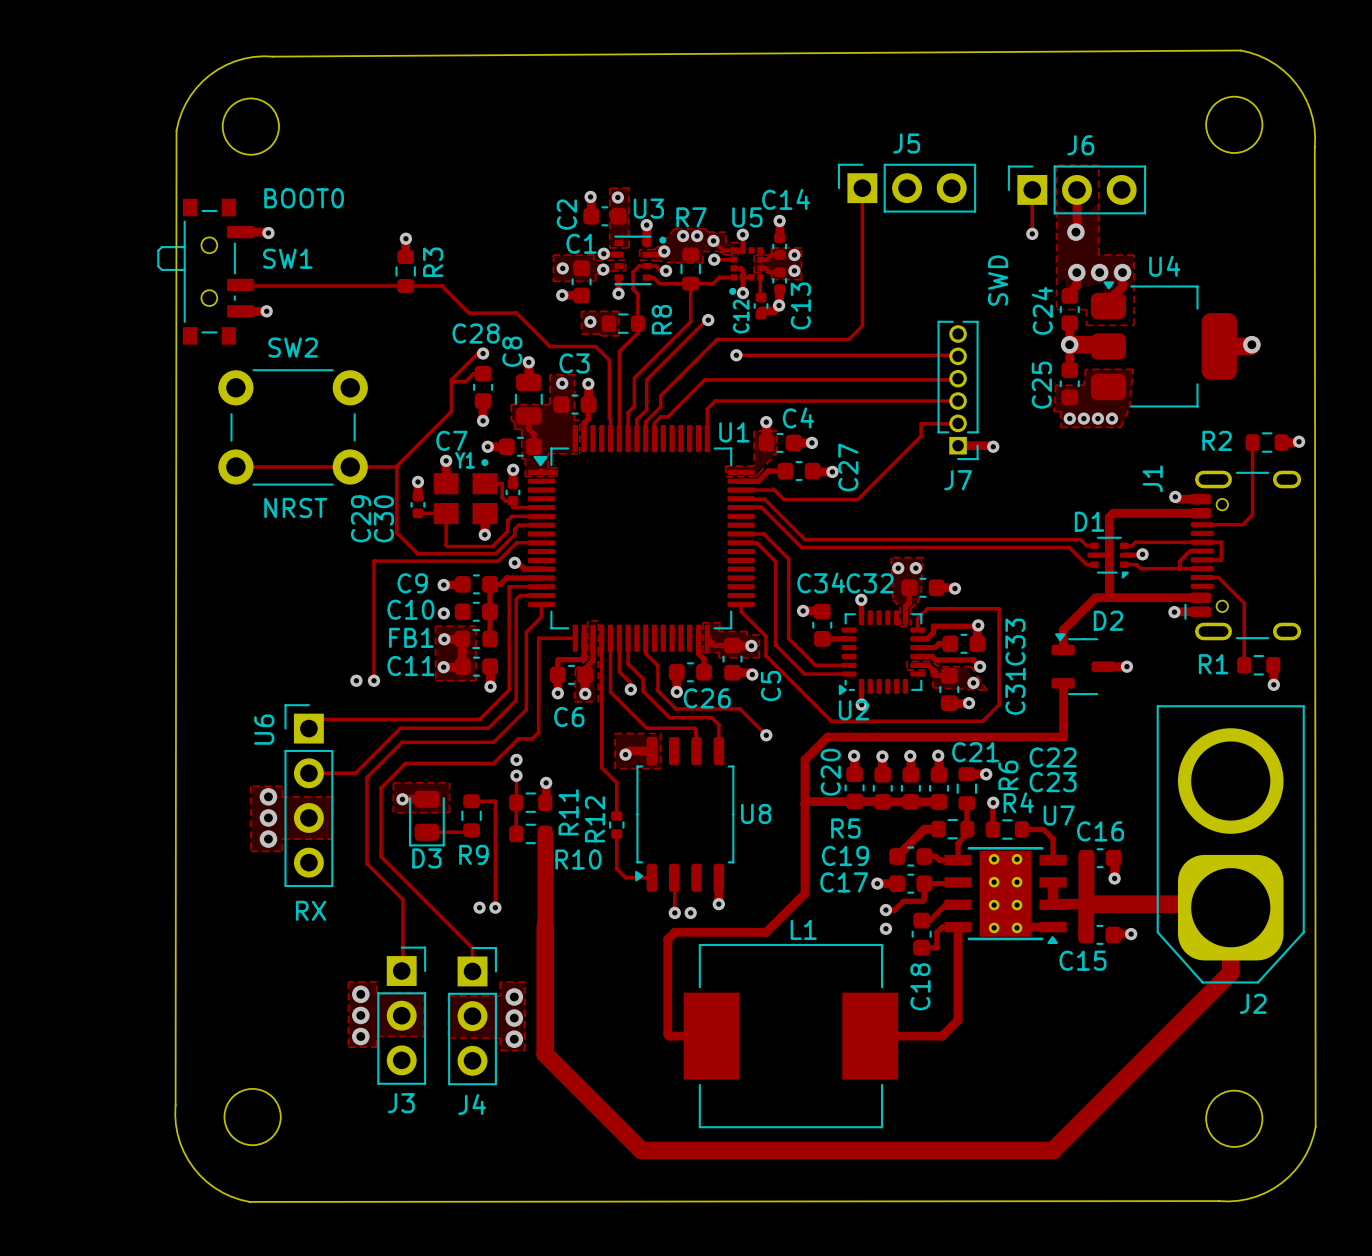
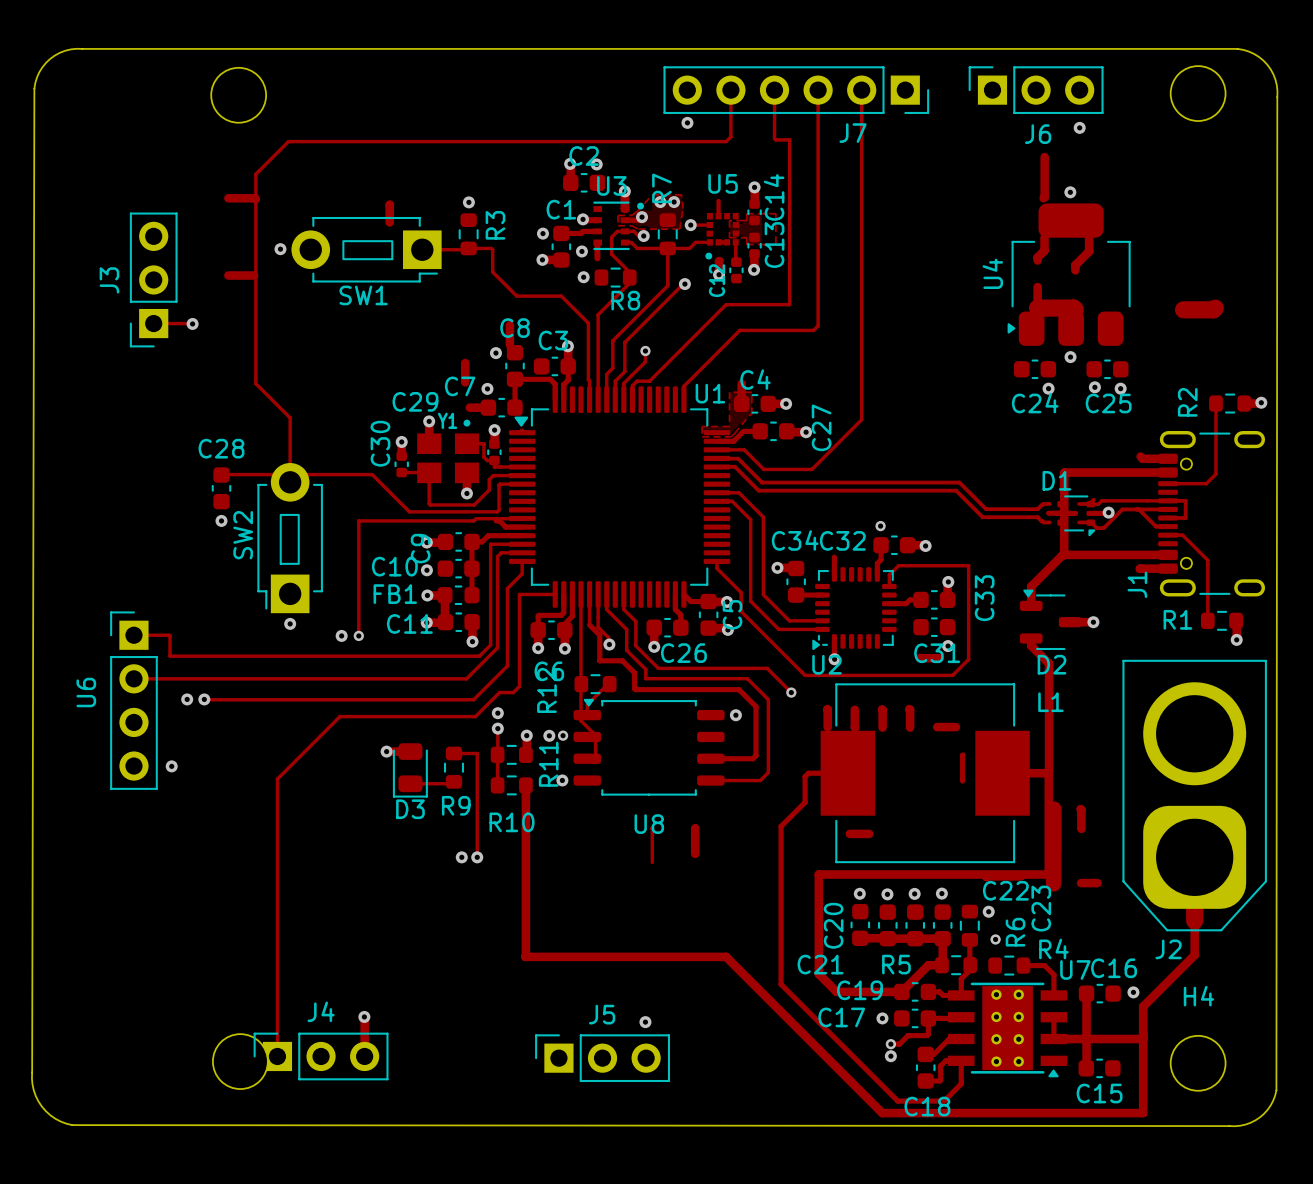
board edge: (1240, 50) (263, 56) (244, 58) (226, 64) (210, 74) (196, 87) (181, 112) (176, 130) (175, 1114) (177, 1133) (183, 1151) (193, 1168) (206, 1181) (231, 1196) (249, 1201) (1228, 1201) (1247, 1199) (1265, 1192) (1281, 1182) (1295, 1169) (1306, 1153) (1315, 1126) (1315, 137) (1310, 109) (1296, 84) (1283, 70) (1267, 59) (1240, 50) -> (82, 48) (65, 50) (50, 58) (39, 72) (34, 88) (31, 1078) (35, 1096) (50, 1115) (72, 1125) (1234, 1126) (1250, 1122) (1267, 1109) (1276, 1090) (1277, 91) (1273, 74) (1263, 60) (1254, 53) (1237, 48) (82, 48)
track: none -> (730, 90) (730, 136) (726, 141) (288, 141) (255, 174) (255, 383) (290, 417) (290, 482)
J6 name position: J6 (1080, 145) -> J6 (1038, 134)
via: none -> (687, 122)
via: none -> (1079, 127)
zone outline: (1056, 165) (1056, 309) (1086, 309) (1086, 325) (1133, 325) (1133, 255) (1098, 255) (1098, 165) (1056, 165) -> none
zone outline: (609, 188) (629, 188) (629, 247) (609, 247) (609, 188) -> none
track: (862, 188) (862, 326) (848, 339) (717, 339) (660, 395) (660, 406) -> (645, 351) (645, 361) (638, 368)
J5 position: (907, 188) -> (602, 1058)
track: (1032, 189) (1032, 233) -> none
J6 position: (1076, 189) -> (1036, 90)
SW1 footprint: [157, 198, 254, 345] -> [291, 216, 442, 283]
text: BOOT0 (304, 198) -> none
C14 name rotation: 0° (786, 199) -> 90° counterclockwise (774, 197)
U3 name position: U3 (648, 208) -> U3 (611, 185)
C2 name rotation: 0° (566, 214) -> 90° clockwise (584, 156)
C2 name position: C2 (566, 214) -> C2 (584, 156)
R7 name rotation: 0° (691, 217) -> 90° counterclockwise (661, 188)
via: none -> (1070, 192)
zone outline: (704, 228) (708, 232) (725, 232) (725, 242) (738, 242) (738, 255) (725, 255) (719, 251) (702, 251) (702, 262) (653, 260) -> (681, 194) (683, 208) (679, 229) (638, 229) (631, 225)
via: (1075, 232) -> none
via: (268, 233) -> none
via: (1032, 233) -> none
via: (742, 234) -> none
via: none -> (468, 202)
via: (405, 238) -> none
track: (713, 240) (723, 250) (733, 250) -> none
via: (713, 240) -> none
track: (779, 254) (771, 254) (767, 259) (760, 259) -> none
zone outline: (553, 255) (593, 255) (593, 260) (625, 260) (625, 270) (611, 270) (604, 274) (595, 274) (595, 281) (553, 281) (553, 255) -> none
via: (794, 255) -> none
SW1 name position: SW1 (287, 258) -> SW1 (363, 295)
track: none -> (597, 231) (557, 233)
track: (733, 268) (742, 270) (742, 292) -> none
track: (760, 268) (765, 268) (769, 272) (779, 272) -> none
via: (603, 269) -> none
via: (794, 270) -> none
R3 position: (405, 271) -> (468, 234)
via: (1076, 272) -> none
via: (1099, 272) -> none
via: (1122, 272) -> none
text: SWD (998, 280) -> none
track: (240, 284) (441, 285) (469, 313) (516, 313) -> (422, 249) (491, 248) (492, 272) (497, 277)
via: none -> (280, 249)
via: none -> (581, 251)
via: (618, 293) -> none
via position: (742, 293) -> (719, 274)
track: (637, 294) (637, 332) -> (616, 258) (629, 272) (629, 283) (616, 296)
track: none -> (719, 260) (719, 274)
track: (779, 305) (773, 310) (761, 310) -> none
C13 name position: C13 (800, 306) -> C13 (774, 245)
C24 rotation: 0° (1069, 309) -> 90° clockwise (1034, 369)
C24 position: (1069, 309) -> (1034, 369)
C24 name position: C24 (1042, 310) -> C24 (1035, 403)
via: (266, 311) -> none
zone outline: (581, 311) (581, 334) (618, 335) (618, 311) (581, 311) -> none
via: none -> (583, 277)
R8 name rotation: 0° (661, 319) -> 90° clockwise (625, 300)
J7 footprint: [937, 320, 979, 461] -> [663, 66, 930, 114]
via: (590, 321) -> none
R8 position: (623, 323) -> (615, 277)
track: (535, 332) (549, 346) (595, 346) -> (516, 296) (561, 296) (575, 309)
C28 name position: C28 (476, 333) -> C28 (221, 448)
via: (1069, 344) -> none
U4 rotation: 0° (1163, 344) -> 90° counterclockwise (1069, 274)
via: (1251, 344) -> none
SW2 name position: SW2 (293, 347) -> SW2 (243, 535)
C8 name rotation: 0° (512, 351) -> 90° clockwise (515, 328)
track: (483, 353) (477, 353) (451, 379) (451, 411) (395, 467) (235, 467) -> none
via: (483, 353) -> none
track: (736, 355) (958, 356) -> none
via: (736, 355) -> none
track: none -> (153, 323) (192, 323)
via: none -> (192, 323)
via: (528, 362) -> none
C3 name position: C3 (574, 363) -> C3 (553, 340)
SW2 footprint: [218, 369, 368, 486] -> [257, 463, 323, 614]
zone outline: (1085, 369) (1133, 369) (1129, 408) (1120, 427) (1060, 427) (1060, 411) (1053, 411) (1055, 385) (1083, 385) (1085, 369) -> none
track: (483, 373) (473, 373) (465, 381) (451, 381) -> none
C8 footprint: [514, 373, 543, 425] -> [505, 345, 525, 388]
zone outline: (549, 374) (574, 374) (574, 420) (579, 420) (579, 453) (548, 453) (548, 467) (556, 467) (556, 476) (525, 476) (525, 459) (521, 459) (521, 429) (514, 429) (514, 422) (511, 420) (511, 404) (549, 404) (549, 374) -> none
track: (958, 378) (704, 379) (667, 416) (660, 416) (654, 424) -> (774, 90) (774, 138) (789, 139) (789, 304) (726, 304) (649, 381) (637, 381) (632, 385)
via: (562, 383) -> none
C25 rotation: 0° (1069, 383) -> 90° clockwise (1107, 369)
C25 position: (1069, 383) -> (1107, 369)
C25 name position: C25 (1041, 385) -> C25 (1108, 403)
C28 position: (483, 387) -> (221, 488)
via: none -> (645, 351)
via: none -> (495, 353)
via: none -> (1070, 357)
track: (958, 401) (715, 401) (707, 409) (707, 424) -> (818, 90) (818, 325) (813, 330) (739, 330) (683, 386)
track: (528, 415) (528, 429) (534, 434) -> (555, 399) (555, 384) (550, 379) (515, 379) (515, 395)
C4 name position: C4 (798, 417) -> C4 (755, 379)
via: (1069, 418) -> none
via: (1083, 418) -> none
via: (1097, 418) -> none
via: (1112, 418) -> none
via: (483, 420) -> none
via: (766, 422) -> none
track: (958, 423) (921, 423) (921, 436) (857, 499) (783, 499) (774, 490) (769, 490) -> (861, 90) (861, 419) (811, 469) (763, 469) (744, 449)
via: none -> (1094, 387)
via: none -> (487, 388)
via: none -> (1048, 388)
via: none -> (1120, 388)
C7 name position: C7 (451, 440) -> C7 (460, 386)
R2 name rotation: 0° (1217, 440) -> 90° counterclockwise (1187, 402)
track: (958, 445) (993, 446) -> none
via: (487, 446) -> none
via: (993, 446) -> none
track: (396, 466) (396, 532) (417, 553) (425, 553) -> (290, 482) (297, 474) (372, 474) (409, 511)
J1 footprint: [1184, 470, 1302, 641] -> [1158, 431, 1266, 597]
J1 name position: J1 (1152, 478) -> J1 (1137, 584)
J7 name position: J7 (958, 480) -> J7 (852, 133)
via: (1175, 496) -> none
track: (752, 499) (764, 499) (804, 539) (1080, 539) (1086, 545) (1094, 545) -> (727, 458) (738, 458) (762, 482) (959, 482) (986, 509) (1037, 509) (1043, 503) (1049, 503)
text: NRST (295, 507) -> none
track: (752, 507) (761, 507) (801, 547) (1069, 547) (1086, 564) (1094, 564) -> (727, 466) (734, 466) (758, 490) (956, 490) (982, 517) (1037, 517) (1043, 522) (1049, 522)
track: (1113, 513) (1109, 517) (1109, 597) -> (1080, 472) (1064, 472) (1064, 554) (1062, 554)
track: none -> (221, 475) (282, 474) (290, 482)
C29 name rotation: 0° (361, 518) -> 90° clockwise (415, 401)
C29 name position: C29 (361, 518) -> C29 (415, 401)
C30 name position: C30 (383, 518) -> C30 (380, 443)
track: (517, 526) (514, 529) (514, 534) (495, 553) -> (499, 485) (499, 510) (497, 511) (477, 511)
track: none -> (1093, 499) (1089, 503) (1079, 503)
track: (541, 542) (516, 542) (498, 561) (374, 561) (374, 562) -> (521, 518) (476, 518) (473, 520) (358, 520)
track: (1189, 551) (1179, 561) (1179, 568) -> (1154, 509) (1122, 509) (1103, 528) (1096, 528) (1091, 522) (1079, 522)
track: none -> (1048, 513) (1064, 514)
zone outline: (891, 557) (922, 557) (921, 592) (917, 603) (910, 608) (910, 626) (900, 626) (900, 606) (892, 599) (891, 557) -> none
via: none -> (221, 520)
via: (514, 562) -> none
track: (1124, 564) (1136, 564) (1140, 568) (1179, 568) -> none
via: (898, 568) -> none
via: none -> (880, 526)
via: (915, 568) -> none
track: (1179, 568) (1191, 568) -> (1138, 509) (1156, 526)
C9 name rotation: 0° (412, 583) -> 90° counterclockwise (420, 548)
via: (861, 599) -> none
via: (1174, 612) -> none
zone outline: (587, 620) (587, 658) (575, 669) (574, 701) (598, 701) (598, 620) (587, 620) -> none
D2 name position: D2 (1108, 620) -> D2 (1051, 664)
zone outline: (702, 622) (720, 622) (718, 631) (746, 631) (746, 635) (759, 635) (759, 657) (718, 657) (718, 652) (702, 652) (702, 622) -> none
track: (978, 625) (933, 626) (933, 632) (927, 638) (917, 638) -> none
zone outline: (435, 626) (435, 680) (476, 680) (476, 626) (435, 626) -> none
track: (628, 653) (628, 663) (643, 678) (643, 691) (669, 717) (711, 717) (718, 724) (718, 751) -> (606, 609) (626, 629) (626, 650) (645, 669) (645, 678) (747, 678) (768, 699) (768, 772) (760, 780) (710, 780)
track: (917, 656) (932, 656) (935, 659) (973, 659) (980, 666) -> none
zone outline: (907, 661) (907, 670) (930, 670) (933, 687) (987, 690) (971, 666) (939, 666) (929, 661) (907, 661) -> none
track: (917, 665) (928, 665) (935, 672) (935, 675) (949, 675) -> none
C11 name position: C11 (410, 666) -> C11 (409, 623)
via: (980, 666) -> none
track: (610, 669) (610, 692) (646, 728) (694, 728) (696, 734) (696, 751) -> (589, 625) (599, 635) (599, 660) (622, 660) (634, 673) (635, 689) (738, 689) (755, 706) (755, 755) (752, 758) (710, 758) (724, 758)
via position: (374, 680) -> (290, 623)
via: none -> (358, 635)
via: (973, 682) -> none
track: (1063, 683) (1063, 737) (827, 737) (805, 759) (805, 893) (766, 932) (674, 932) (667, 939) (667, 1034) (669, 1036) (711, 1036) -> (1031, 638) (1031, 645) (1049, 663) (1049, 772)
C5 name position: C5 (770, 686) -> C5 (732, 614)
C31 rotation: 0° (949, 689) -> 90° clockwise (934, 627)
via: none -> (948, 646)
C31 name position: C31 (1015, 691) -> C31 (937, 653)
track: (516, 692) (516, 700) (488, 728) (400, 728) (355, 773) (308, 773) -> (497, 647) (466, 678) (133, 678)
track: (497, 701) (479, 719) (310, 719) -> (479, 656) (170, 656) (169, 635) (133, 635)
via: (969, 703) -> none
track: (675, 708) (739, 708) (766, 735) -> (653, 663) (658, 668) (767, 668) (791, 692)
track: (526, 709) (493, 742) (402, 742) (366, 777) (366, 863) (403, 899) (401, 971) -> (507, 664) (473, 699) (204, 699)
U6 name position: U6 (264, 729) -> U6 (86, 692)
track: none -> (609, 684) (587, 704) (587, 715)
zone outline: (615, 733) (660, 733) (660, 768) (615, 768) (615, 733) -> none
via position: (766, 735) -> (735, 715)
via: none -> (791, 692)
via: none -> (187, 699)
via: none -> (204, 699)
track: (651, 751) (629, 751) (625, 754) -> none
C21 name position: C21 (975, 752) -> C21 (820, 964)
via: (625, 754) -> none
via: (854, 755) -> none
via: (938, 755) -> none
via: (882, 756) -> none
via: (910, 756) -> none
C22 name position: C22 (1053, 757) -> C22 (1005, 890)
track: (405, 763) (381, 788) (381, 856) (472, 948) (472, 971) -> (389, 716) (339, 716) (277, 779) (277, 1056)
C20 name position: C20 (830, 772) -> C20 (833, 925)
via: (986, 774) -> none
R6 name position: R6 (1008, 775) -> R6 (1015, 932)
zone outline: (393, 782) (393, 812) (449, 812) (449, 782) (393, 782) -> none
via: none -> (563, 735)
C23 name rotation: 0° (1053, 782) -> 90° counterclockwise (1041, 908)
via: none -> (549, 735)
zone outline: (250, 786) (250, 851) (282, 851) (282, 839) (331, 839) (333, 796) (282, 796) (282, 786) (250, 786) -> none
C20 position: (854, 787) -> (860, 924)
C21 position: (882, 788) -> (887, 925)
C22 position: (910, 788) -> (915, 925)
C23 position: (939, 788) -> (942, 925)
R6 position: (966, 788) -> (969, 925)
U6 position: (308, 795) -> (133, 700)
via: (268, 796) -> none
track: (939, 801) (807, 801) (805, 803) -> none
track: (965, 802) (967, 833) (958, 843) (958, 860) (939, 860) (935, 856) (924, 856) -> (968, 939) (970, 969) (961, 978) (961, 995) (943, 995) (939, 991) (928, 991)
via: (993, 802) -> none
R4 name position: R4 (1018, 802) -> R4 (1053, 948)
R12 footprint: [609, 811, 625, 839] -> [574, 674, 617, 695]
via: none -> (171, 766)
U8 rotation: 0° (684, 814) -> 90° clockwise (649, 747)
U7 name position: U7 (1059, 815) -> U7 (1075, 969)
via: (268, 817) -> none
track: none -> (847, 773) (808, 773) (805, 776) (805, 802) (781, 826) (781, 984) (897, 1101) (944, 1101) (961, 1083) (961, 1060) (945, 1060) (940, 1065) (940, 1080) (925, 1081)
track: none -> (1002, 773) (1048, 773) (1048, 874) (818, 874) (818, 974) (836, 991) (901, 991) (928, 965) (942, 964) (942, 938) (860, 938)
via: none -> (562, 780)
R5 name position: R5 (845, 828) -> R5 (896, 964)
track: (939, 828) (924, 829) (897, 856) -> none
R5 position: (952, 829) -> (956, 965)
R4 position: (1007, 829) -> (1009, 965)
track: (1021, 829) (1043, 829) (1053, 838) (1053, 859) -> (1023, 965) (1044, 965) (1053, 974) (1054, 994)
C16 name position: C16 (1100, 831) -> C16 (1114, 968)
track width: thick (545, 833) (545, 1009) -> thin (525, 785) (525, 956)
via: (268, 839) -> none
track: (616, 839) (616, 868) (625, 877) (651, 877) -> none
C19 name position: C19 (845, 856) -> C19 (859, 990)
C19 position: (910, 856) -> (915, 991)
C16 position: (1100, 858) -> (1099, 993)
R10 name position: R10 (578, 859) -> R10 (511, 822)
via: (1114, 878) -> none
C17 name position: C17 (844, 882) -> C17 (841, 1017)
track: (958, 882) (924, 883) (922, 901) (903, 901) (894, 910) (885, 910) -> (961, 1017) (928, 1018) (926, 1035) (908, 1035) (899, 1044) (890, 1044)
track: (1053, 882) (1053, 904) (1227, 904) -> none
via: (877, 883) -> none
C17 position: (910, 883) -> (915, 1018)
U7 position: (1005, 895) -> (1007, 1029)
via: (718, 904) -> none
track: (957, 904) (945, 904) (929, 920) (921, 920) -> (960, 1038) (949, 1039) (933, 1054) (925, 1054)
text: RX (311, 910) -> none
via: (885, 910) -> none
via: (674, 912) -> none
via: (690, 912) -> none
via position: (885, 928) -> (859, 893)
L1 name position: L1 (803, 929) -> L1 (1050, 702)
C18 position: (921, 934) -> (925, 1067)
C15 position: (1099, 934) -> (1099, 1068)
via: (1131, 934) -> none
via: none -> (941, 893)
via: none -> (887, 894)
via: none -> (914, 893)
track: (921, 947) (936, 947) (936, 932) (942, 927) (958, 927) (958, 1020) (942, 1036) (870, 1036) -> none
C15 name position: C15 (1082, 960) -> C15 (1099, 1093)
via: none -> (988, 911)
track: (1230, 972) (1053, 1150) (641, 1150) (545, 1054) (545, 1009) -> (1194, 920) (1194, 955) (1143, 1006) (1143, 1113) (882, 1113) (726, 956) (525, 956)
zone outline: (348, 982) (348, 1047) (376, 1047) (376, 1036) (424, 1036) (424, 992) (376, 992) (376, 982) (348, 982) -> none
zone outline: (500, 982) (524, 982) (524, 1050) (500, 1050) (500, 1038) (448, 1038) (448, 996) (500, 996) (500, 982) -> none
C18 name rotation: 0° (920, 986) -> 90° clockwise (927, 1106)
via: none -> (995, 939)
via: (360, 994) -> none
via: (514, 996) -> none
J2 name position: J2 (1253, 1003) -> J2 (1168, 949)
via: (360, 1015) -> none
J3 rotation: 0° (401, 1015) -> 180° (153, 279)
J3 position: (401, 1015) -> (153, 279)
J4 rotation: 0° (472, 1016) -> 90° counterclockwise (321, 1056)
J4 position: (472, 1016) -> (321, 1056)
via: (514, 1018) -> none
via: (360, 1036) -> none
L1 position: (790, 1036) -> (925, 773)
via: (514, 1039) -> none
via: none -> (1133, 992)
H4 name: none -> H4 (1198, 996)
track: none -> (364, 1016) (364, 1056)
via: none -> (364, 1016)
track: none -> (1053, 1017) (1053, 1039) (1143, 1039)
via: none -> (882, 1018)
via: none -> (645, 1022)
via: none -> (890, 1044)
J3 name position: J3 (401, 1103) -> J3 (109, 280)
J4 name position: J4 (472, 1104) -> J4 (321, 1011)
via: none -> (890, 1056)

